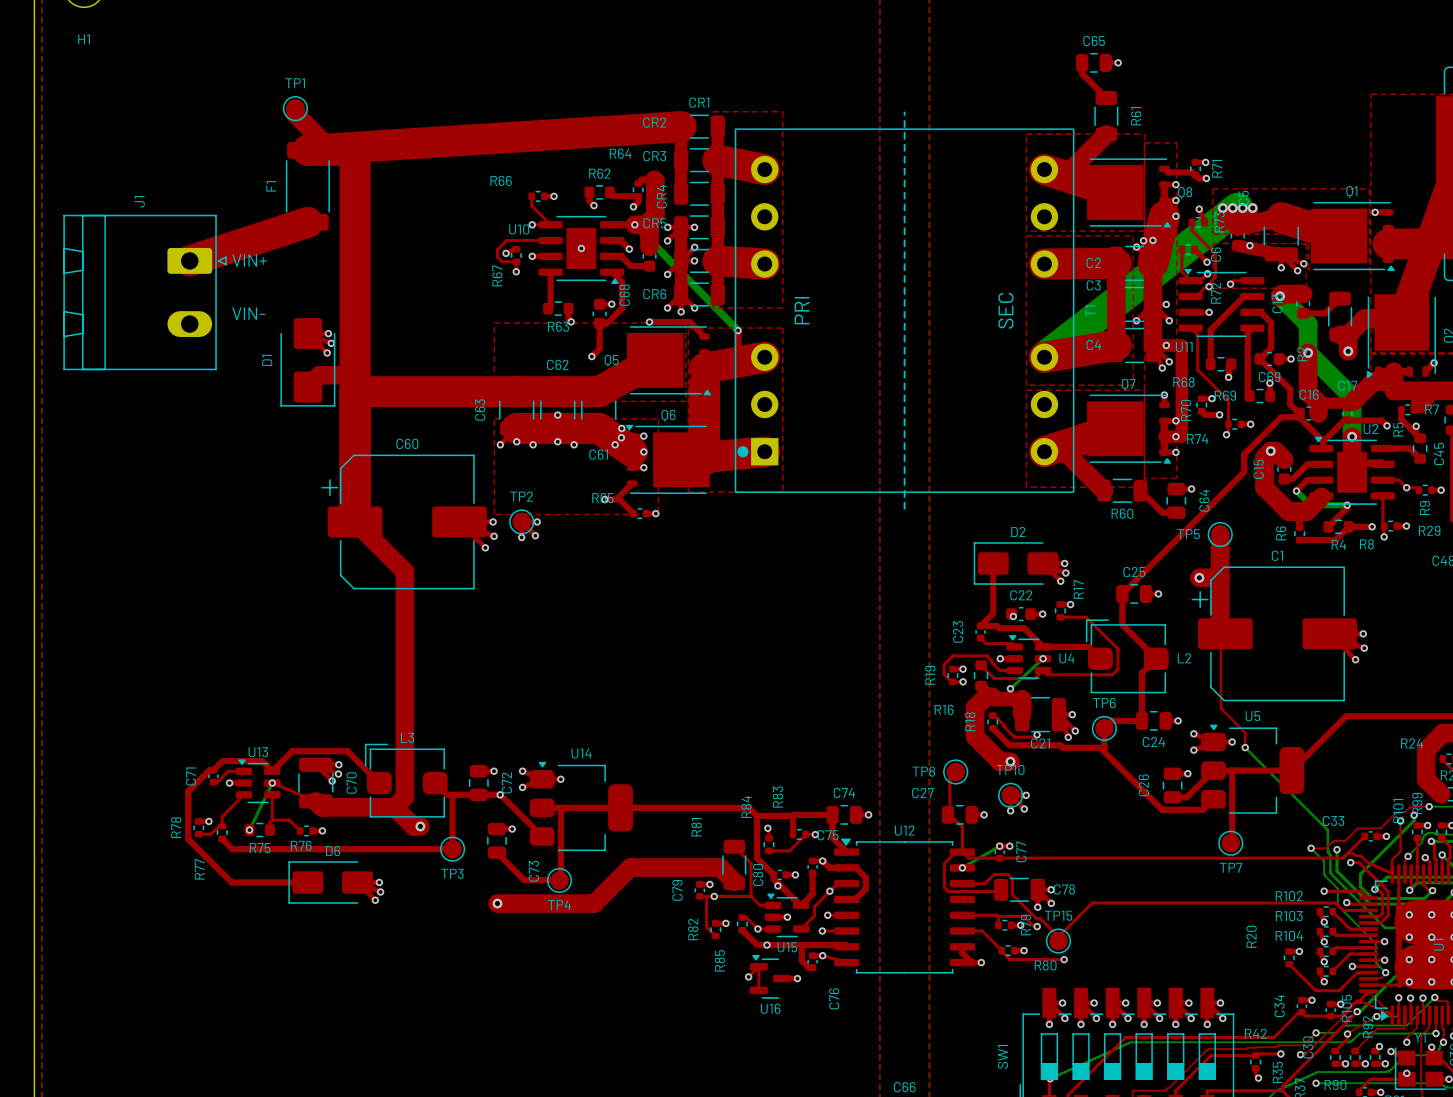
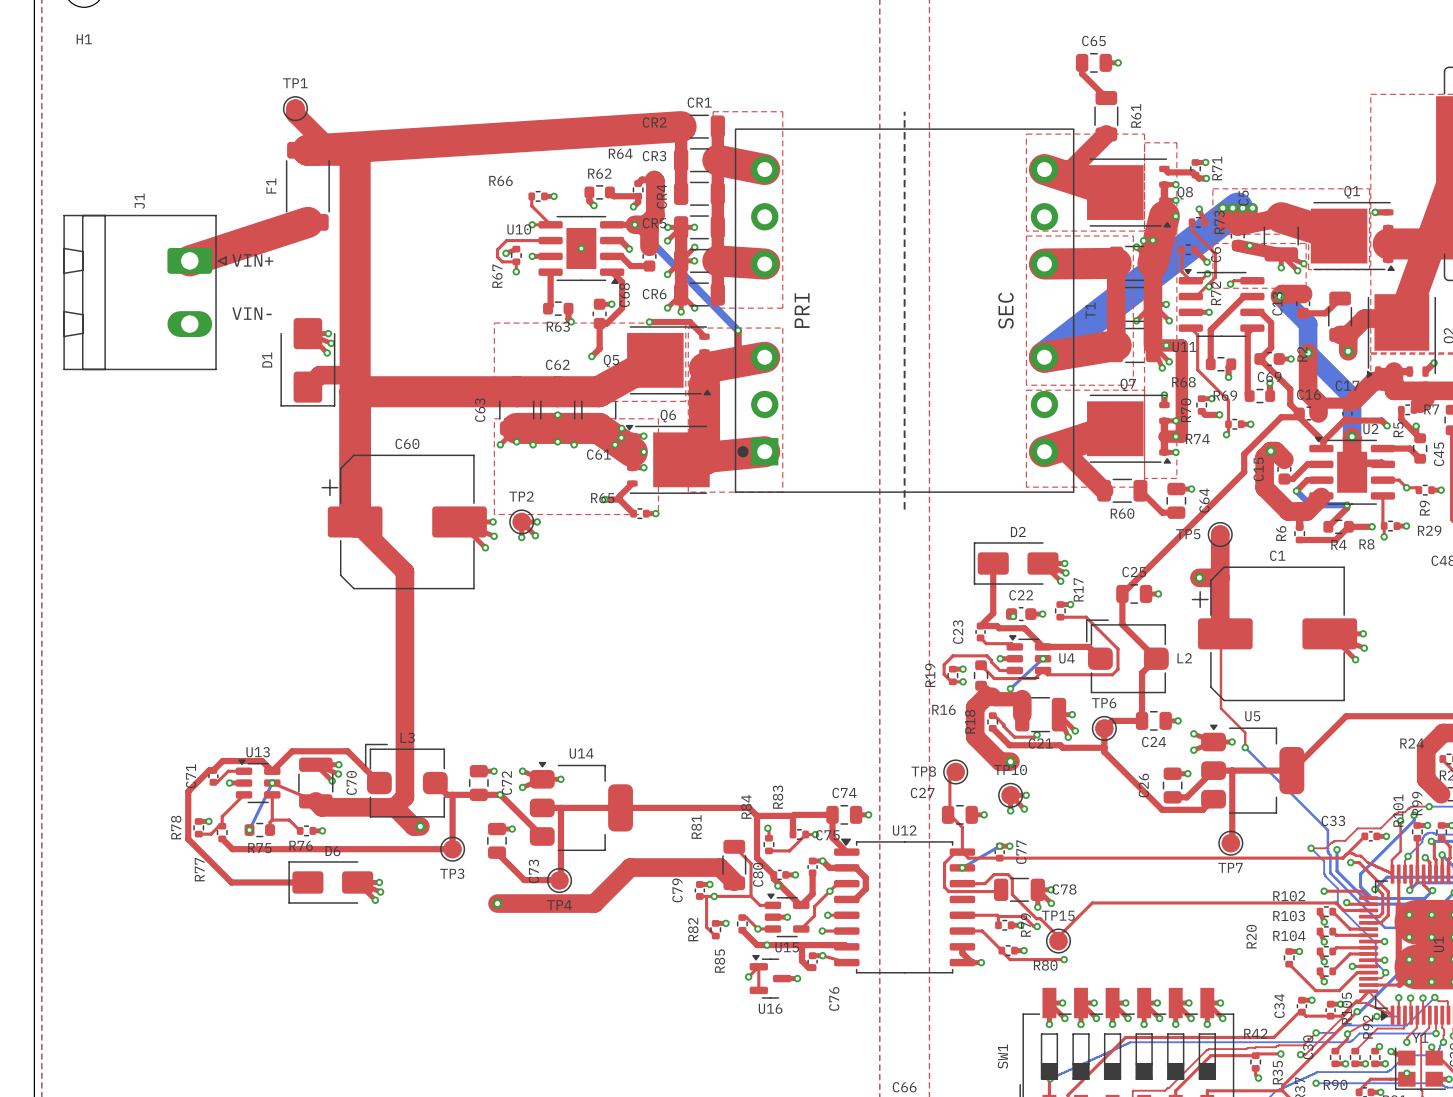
C2 name: C2 (1093, 263) -> none
C3 name: C3 (1093, 285) -> none
C4 name: C4 (1093, 345) -> none

